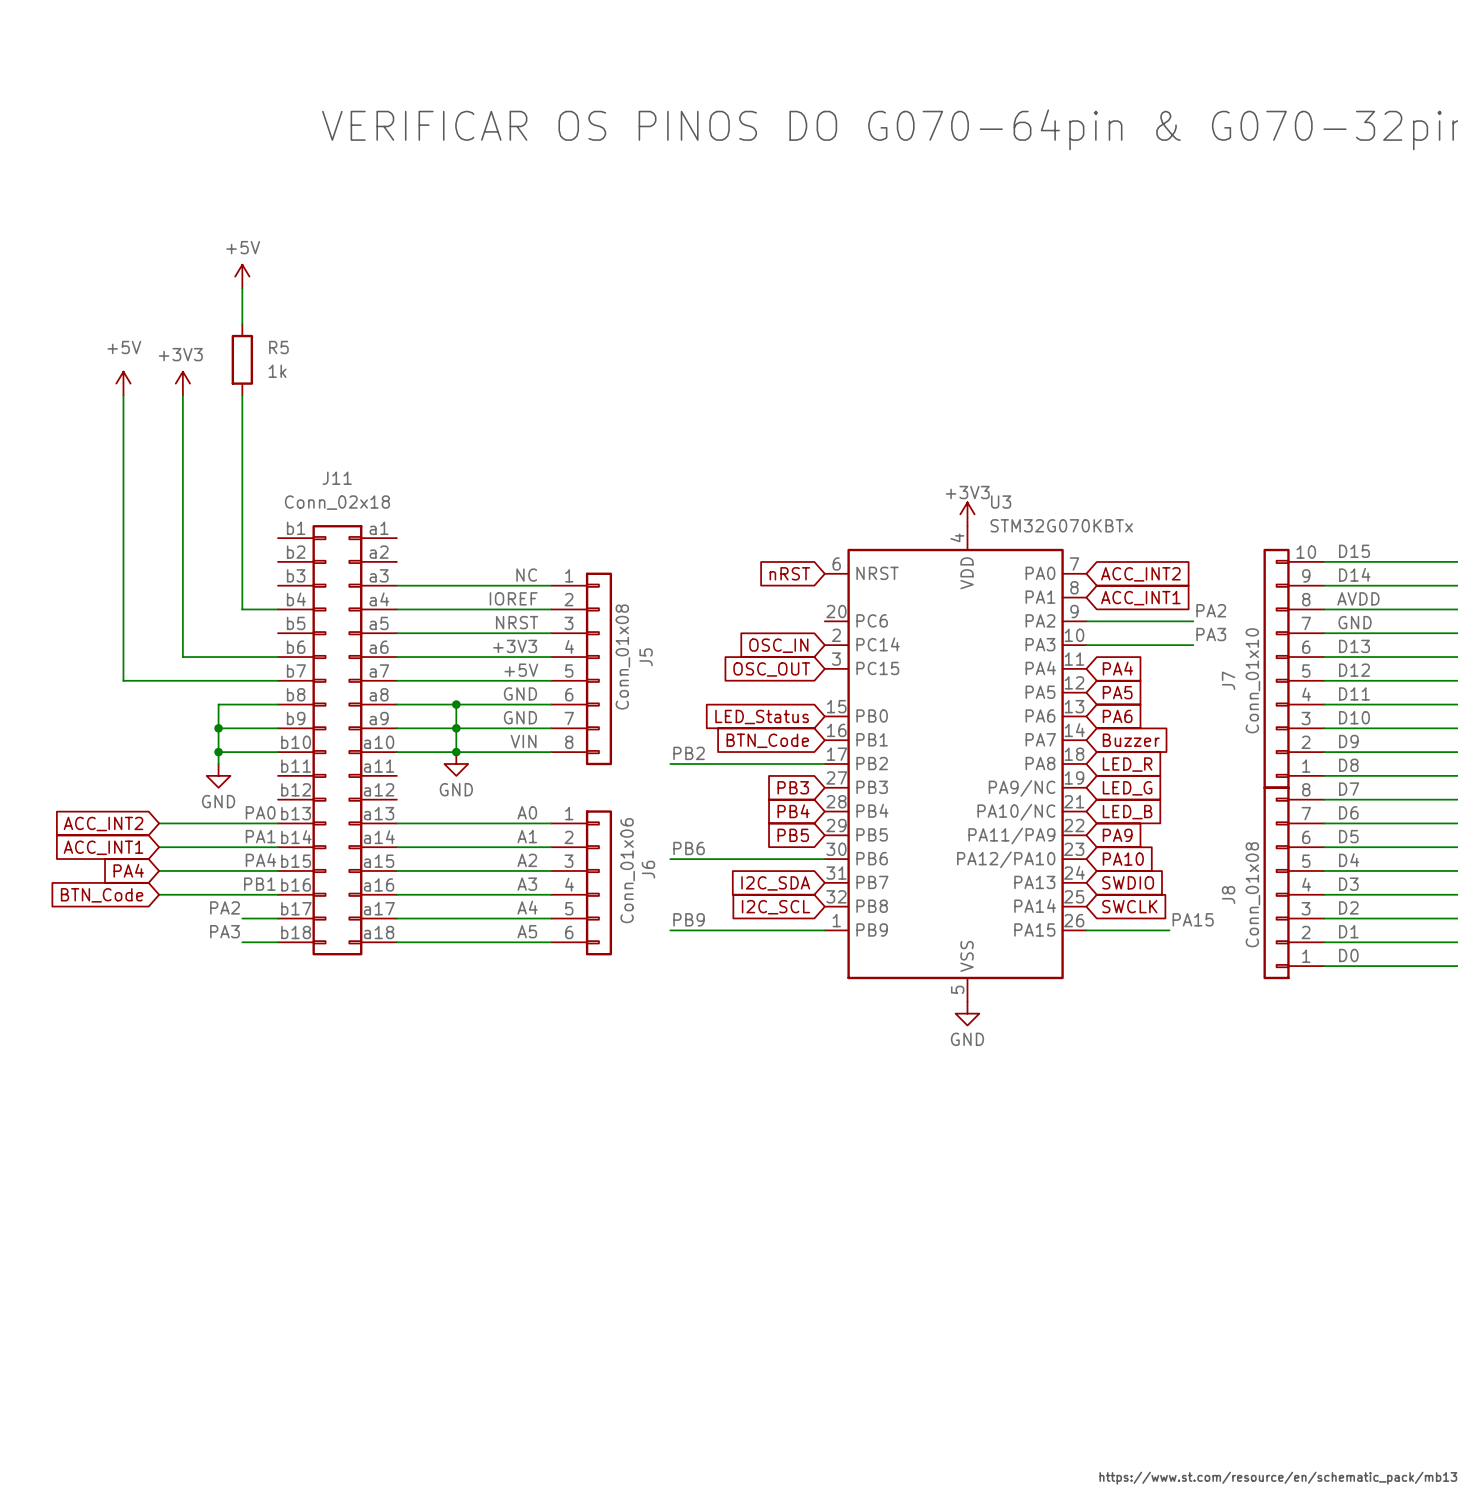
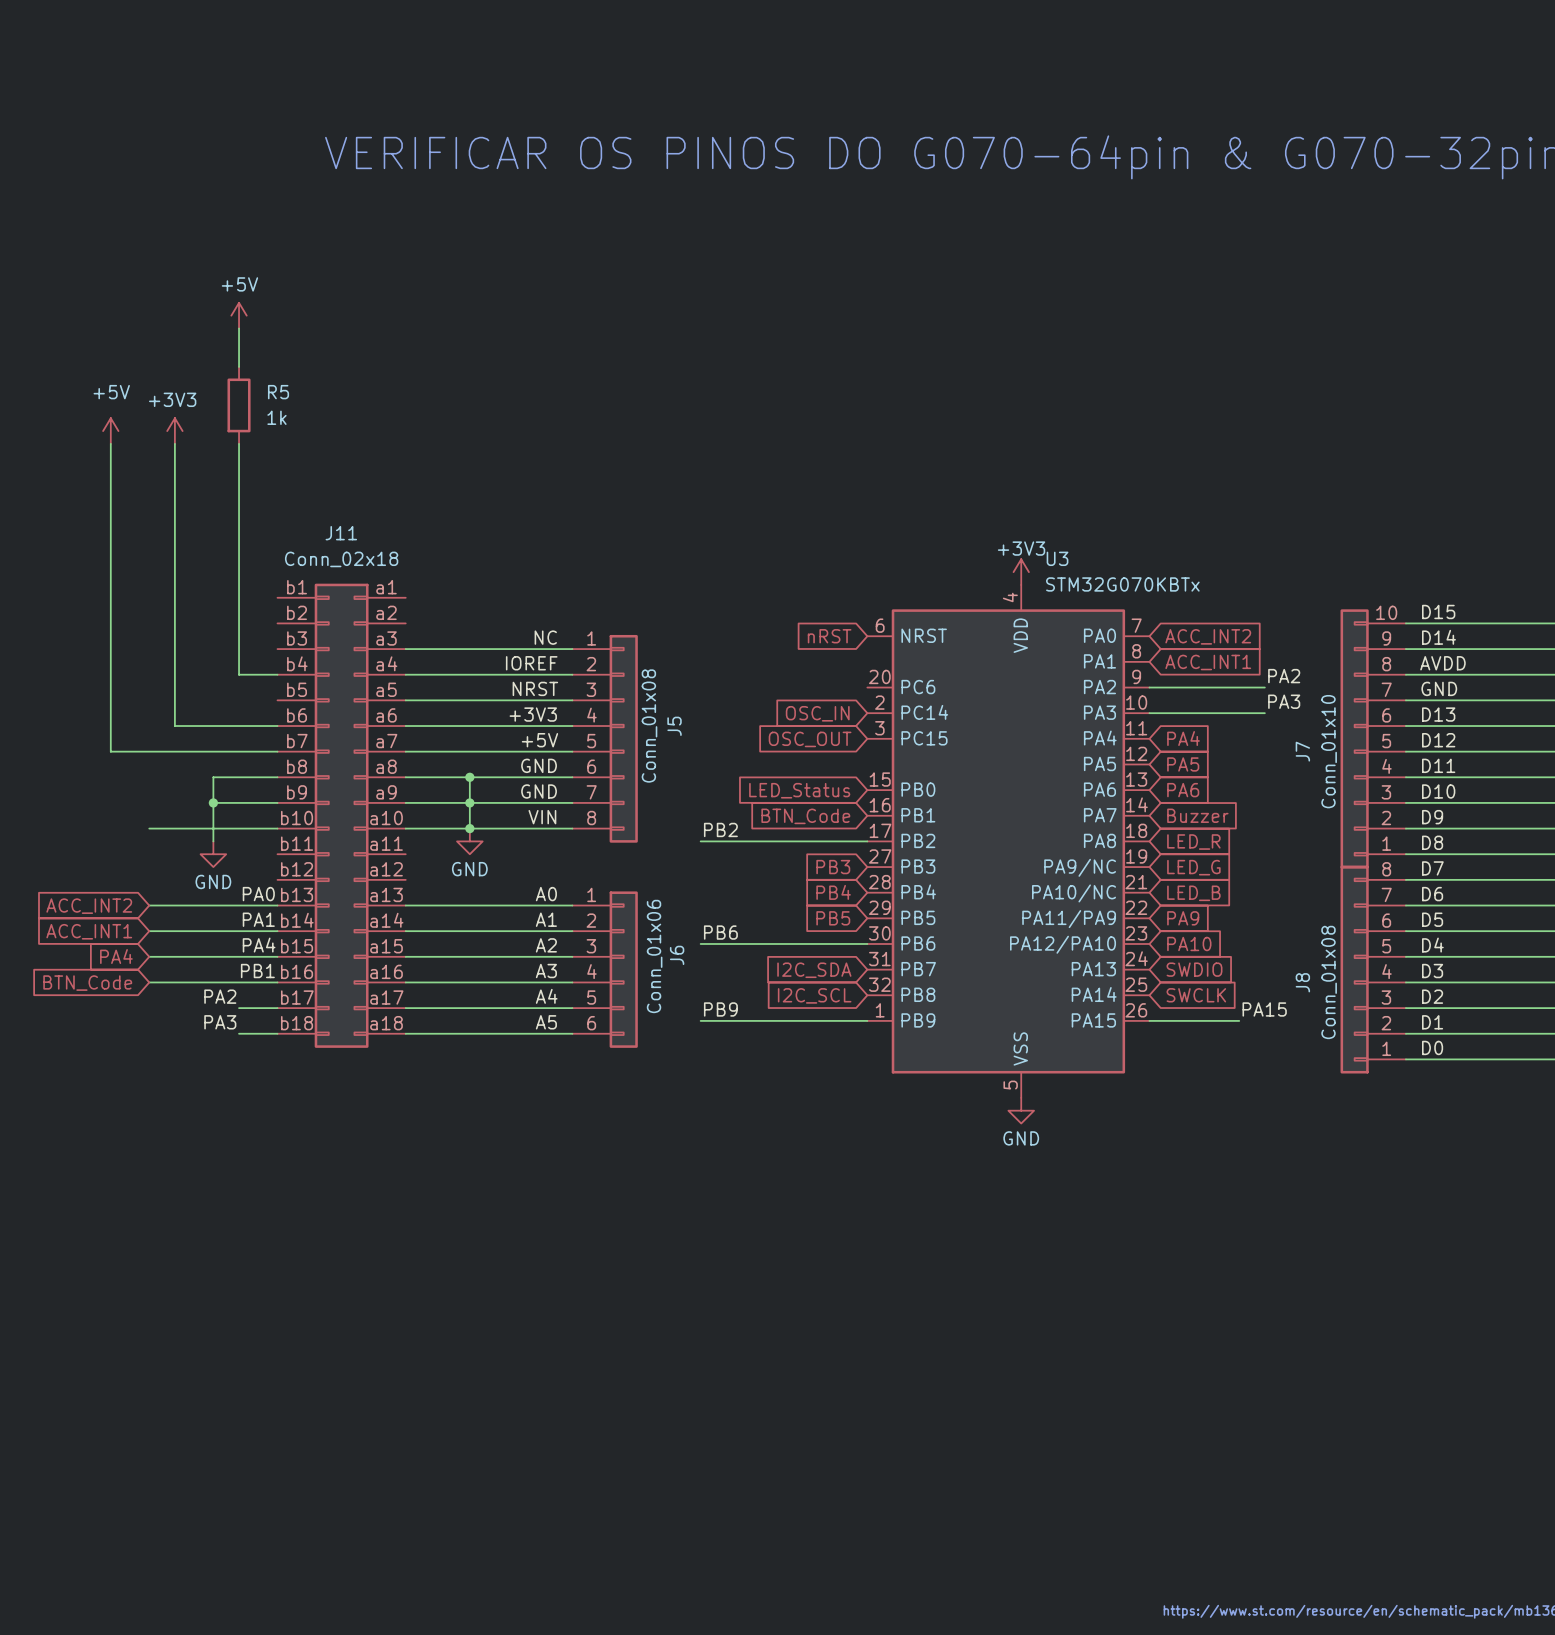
wire: none -> (149, 828) (213, 828)
junction: (218, 752) -> none

